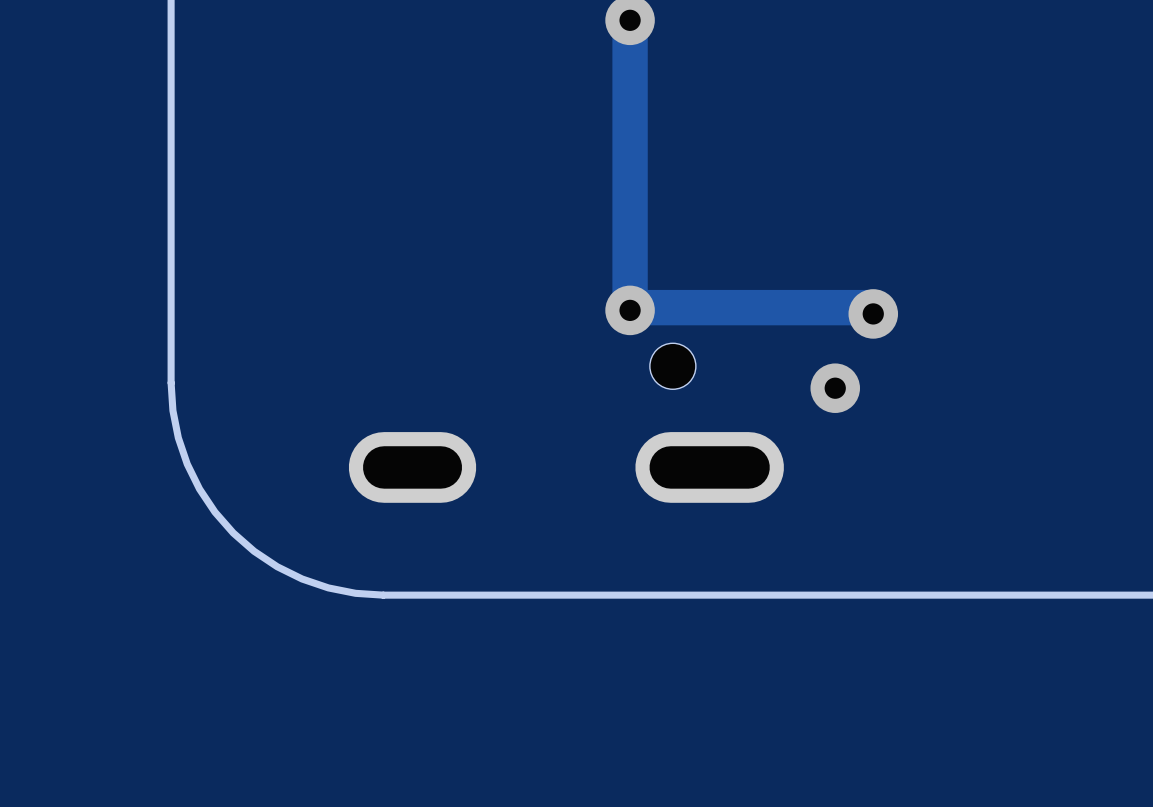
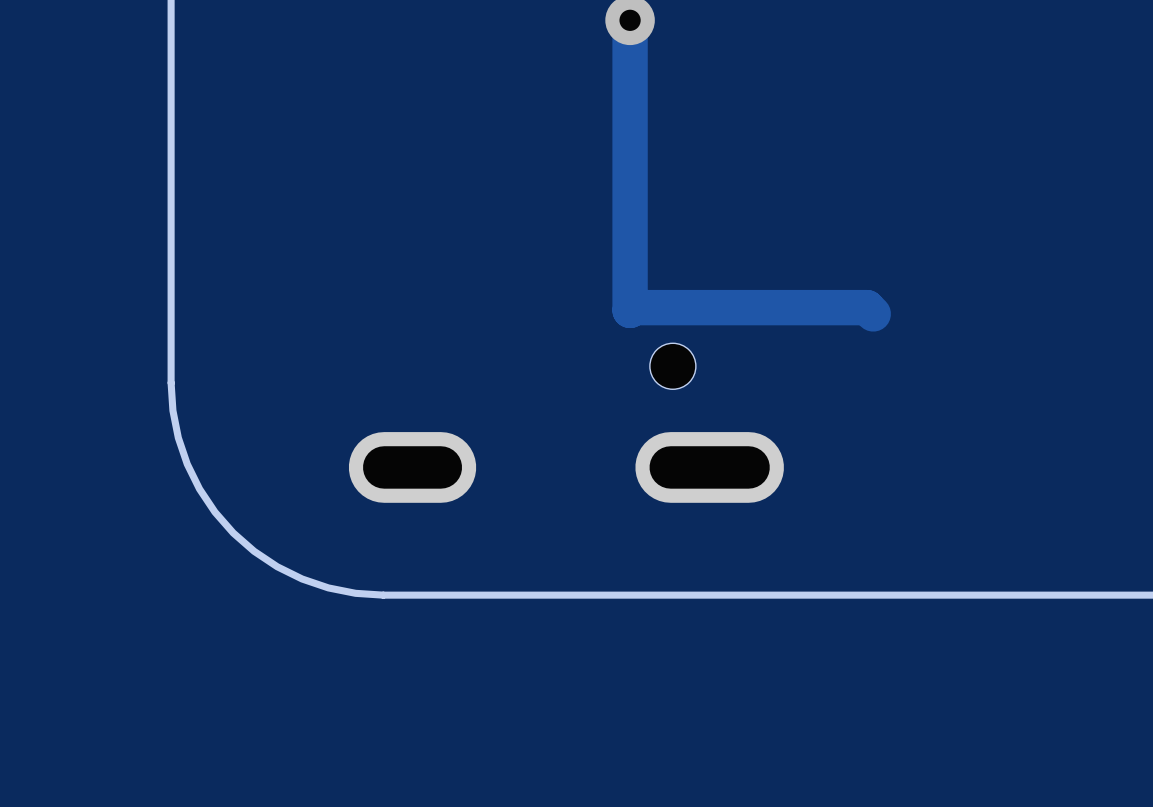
via: (630, 310) -> none
via: (873, 313) -> none
via: (835, 388) -> none

